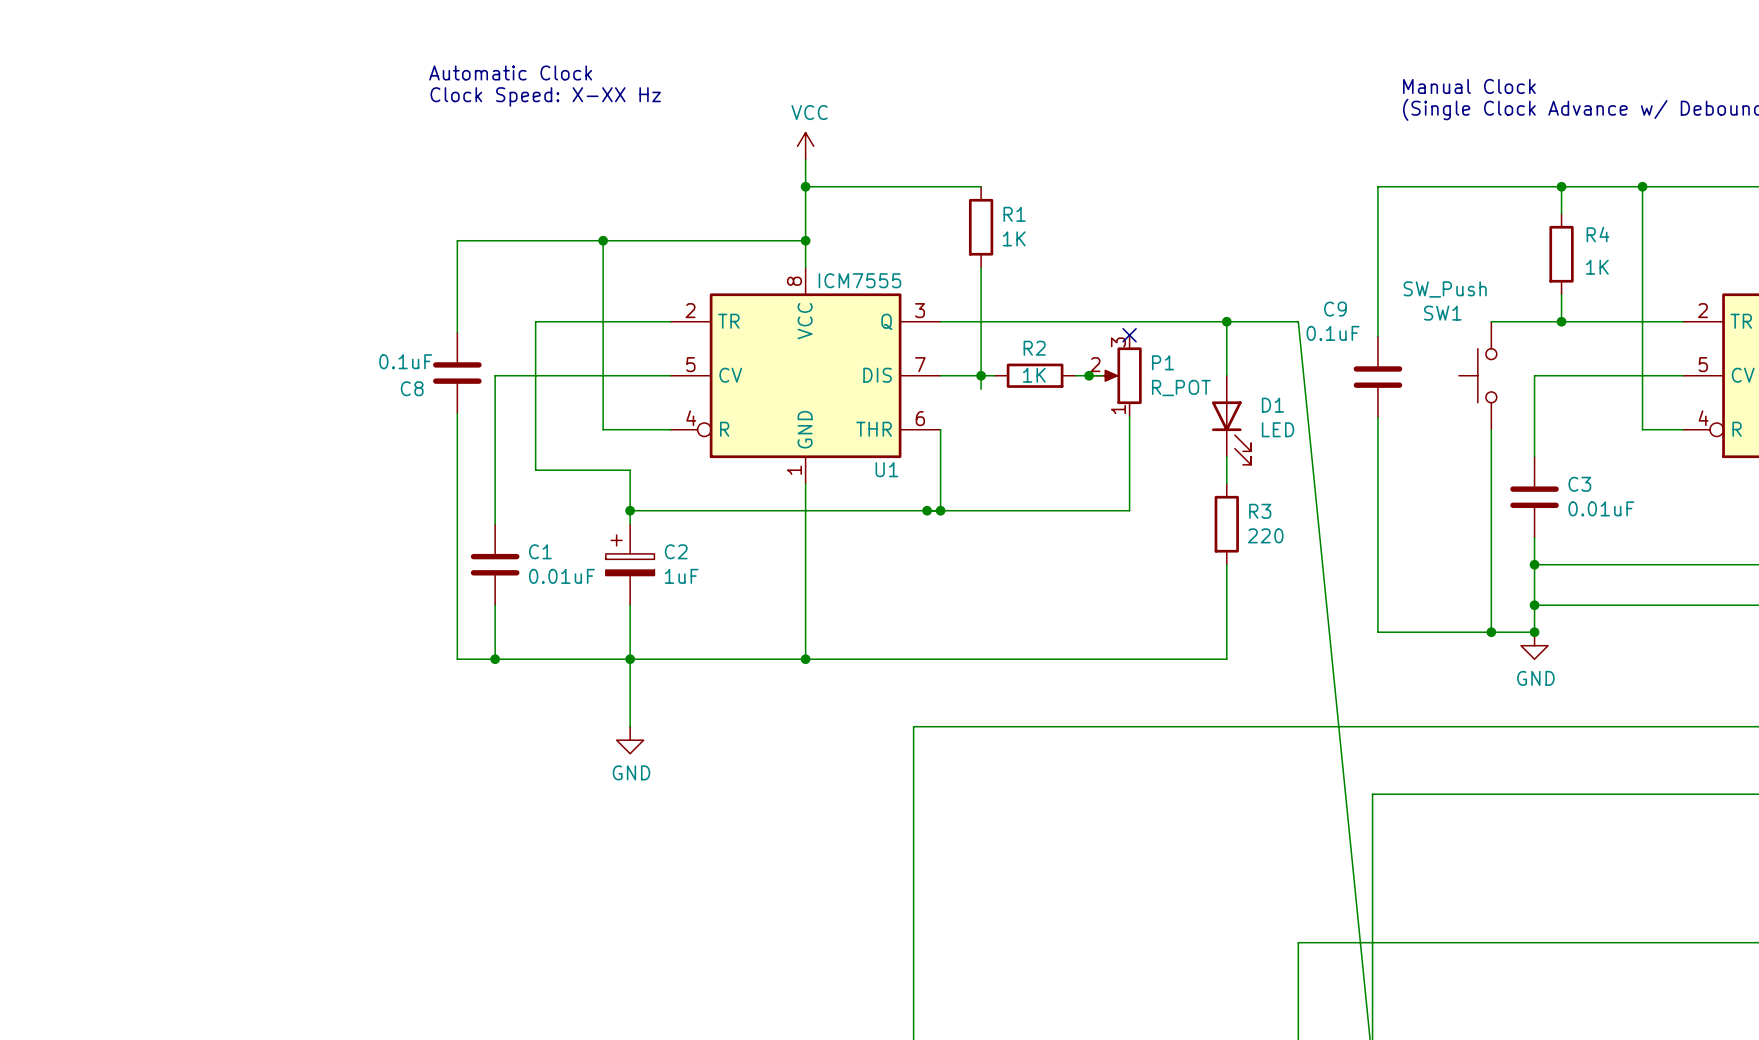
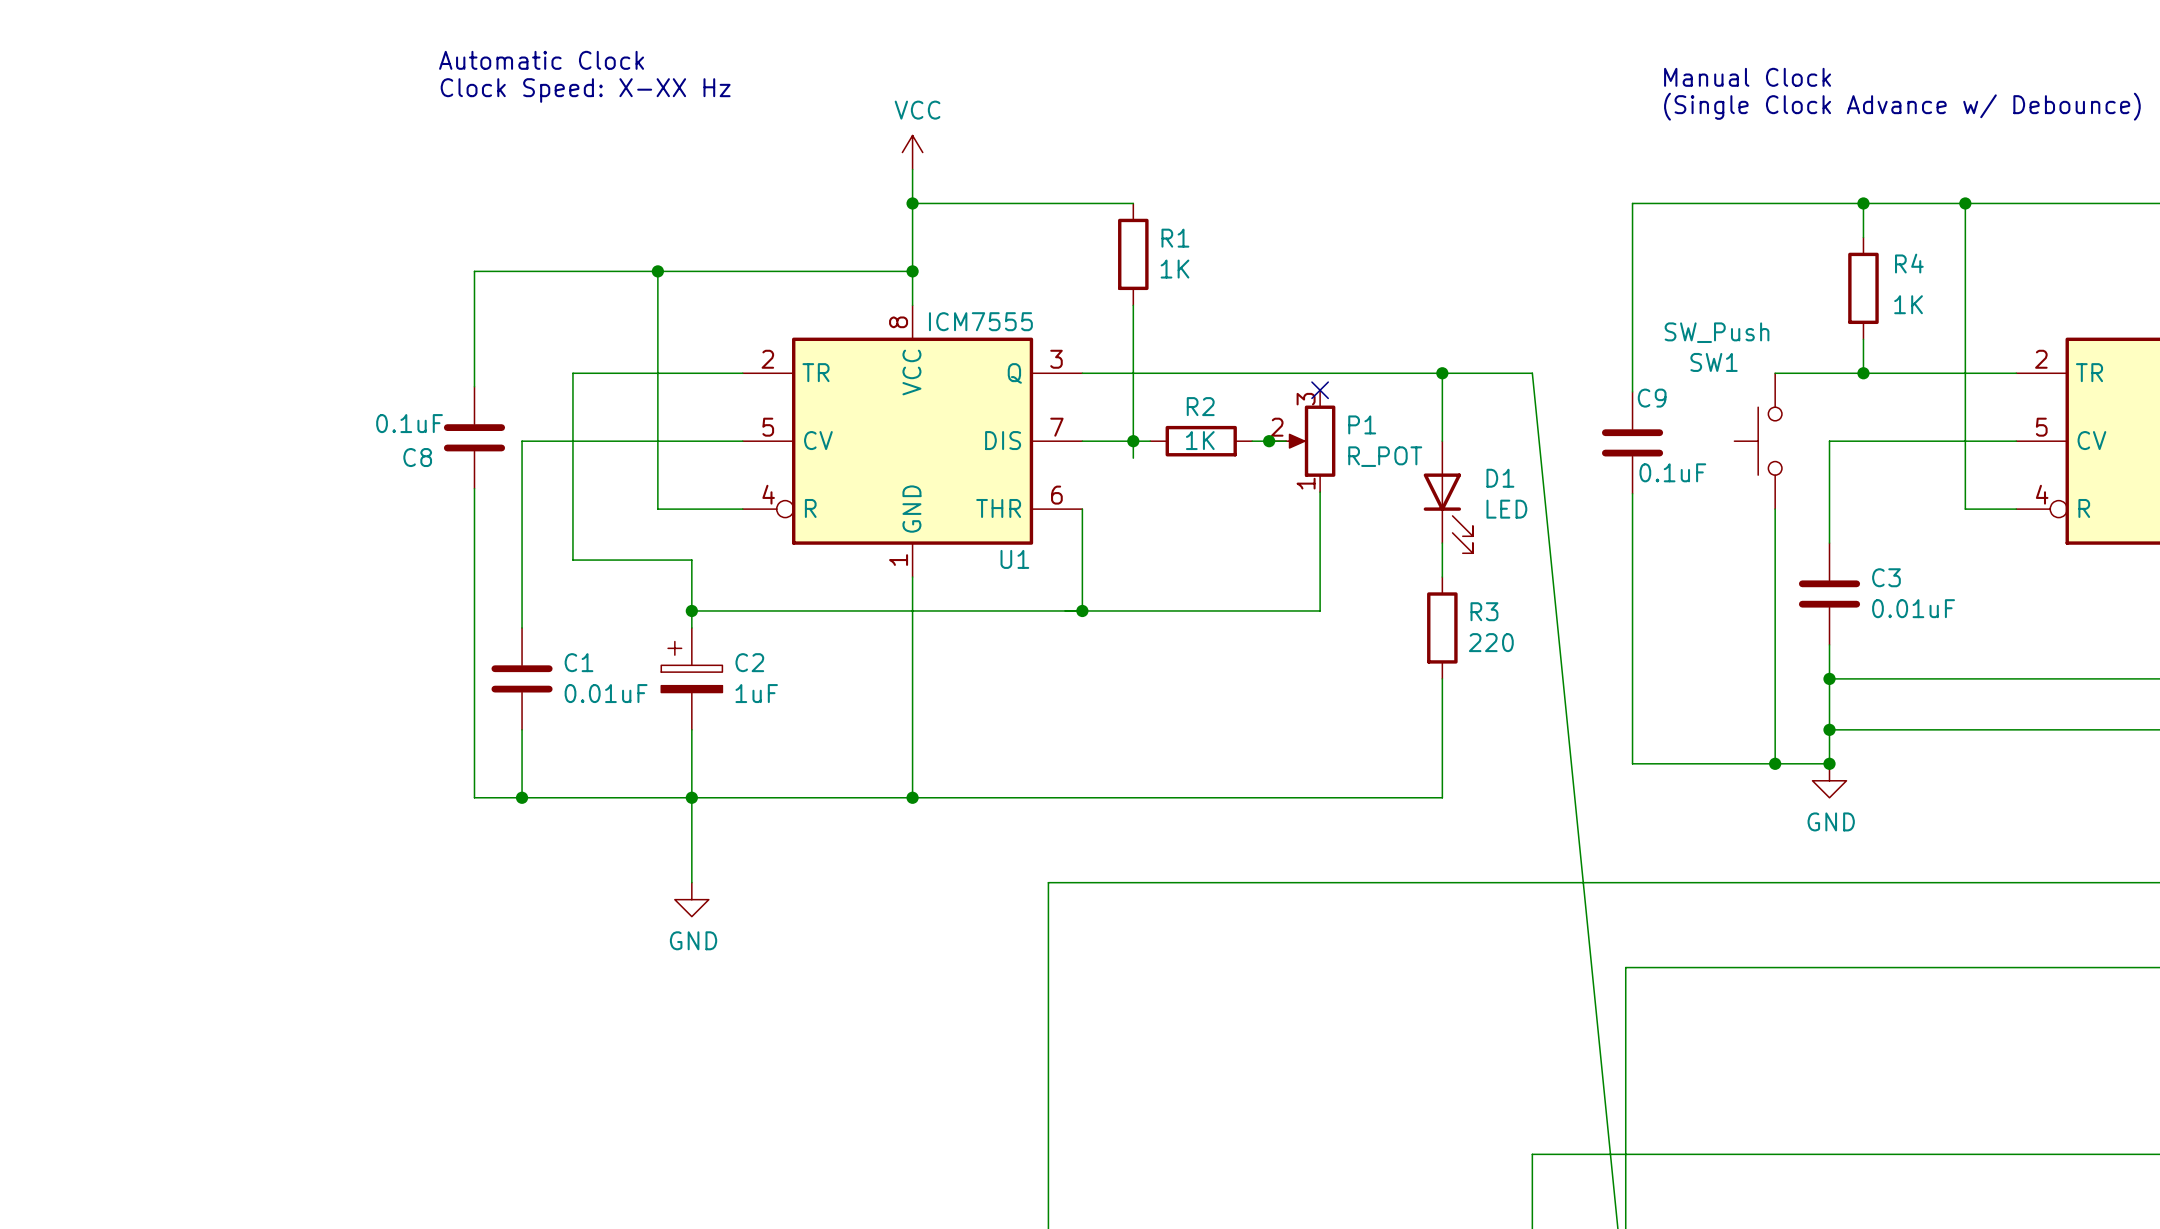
C9 name position: C9 (1335, 309) -> C9 (1652, 398)
C9 value position: 0.1uF (1333, 333) -> 0.1uF (1672, 472)
junction: (927, 510) -> none

